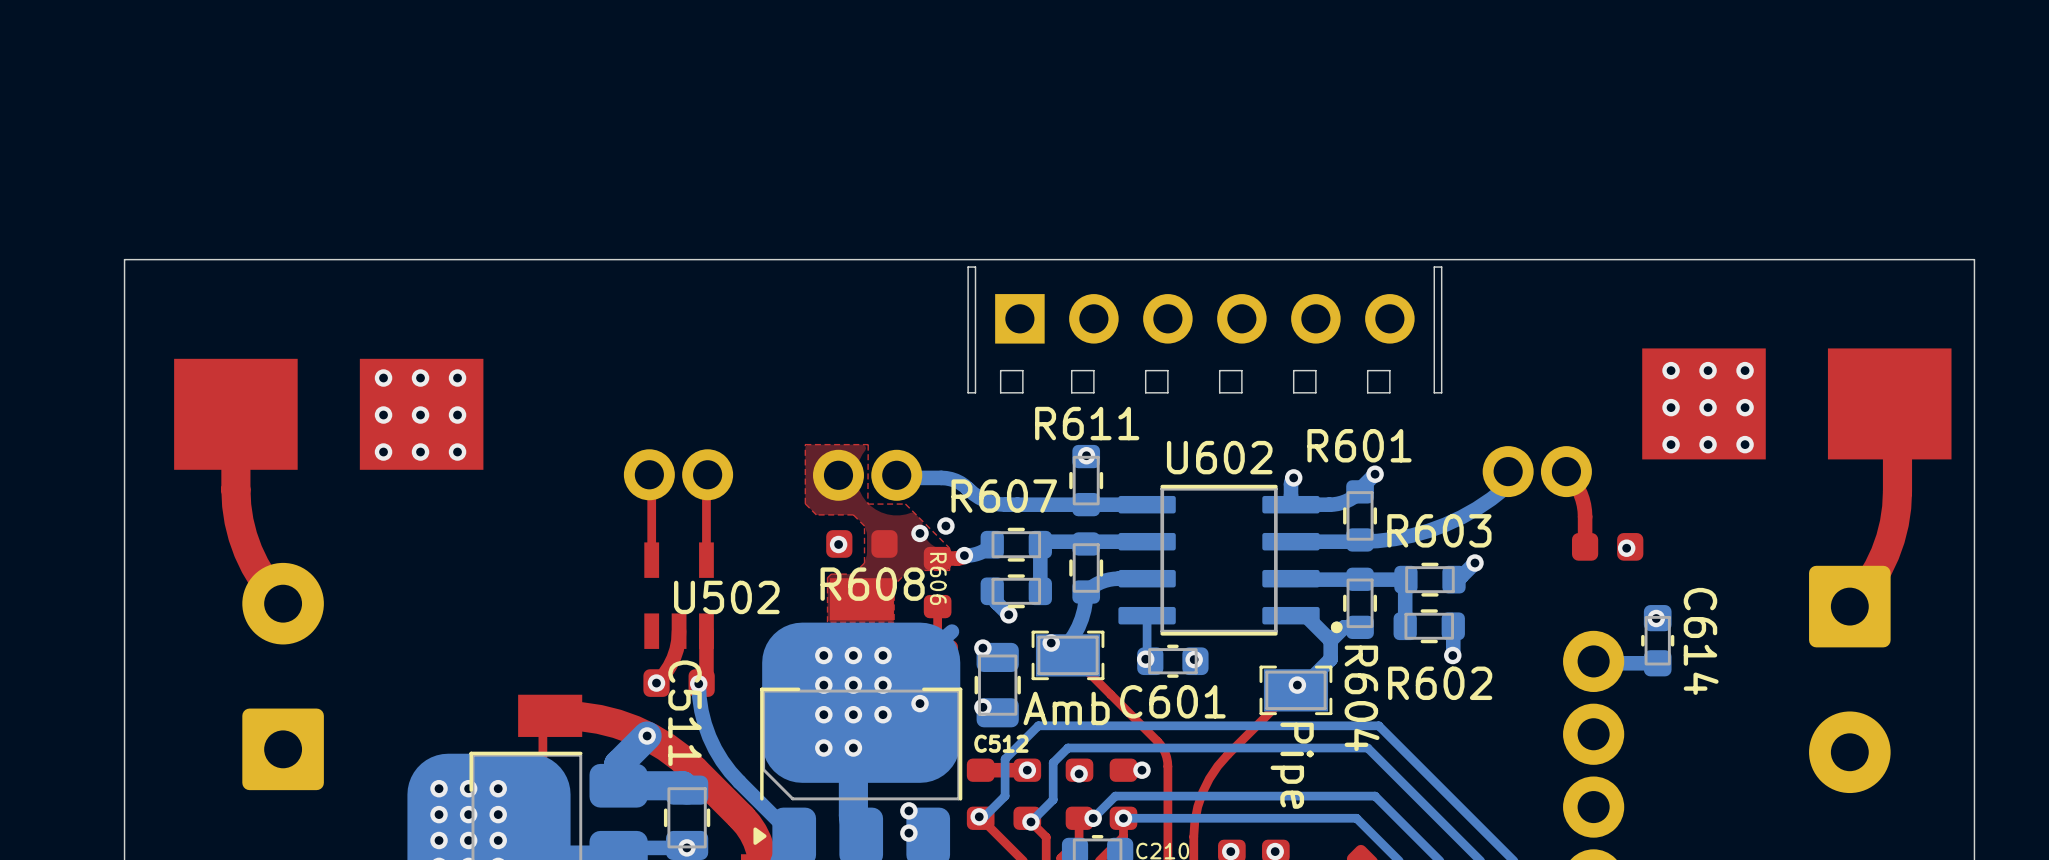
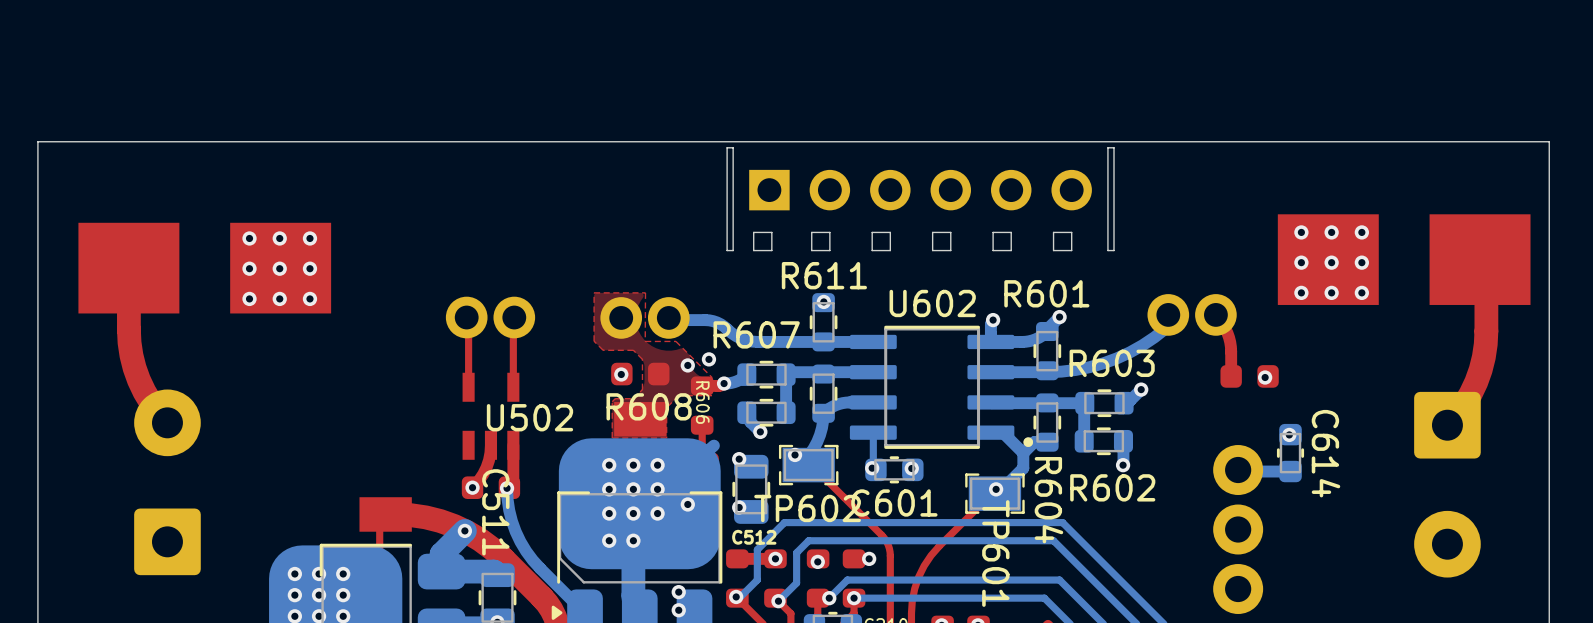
Amb name: Amb (1066, 708) -> TP602 (807, 508)
Pipe name: Pipe (1292, 765) -> TP601 (995, 553)

